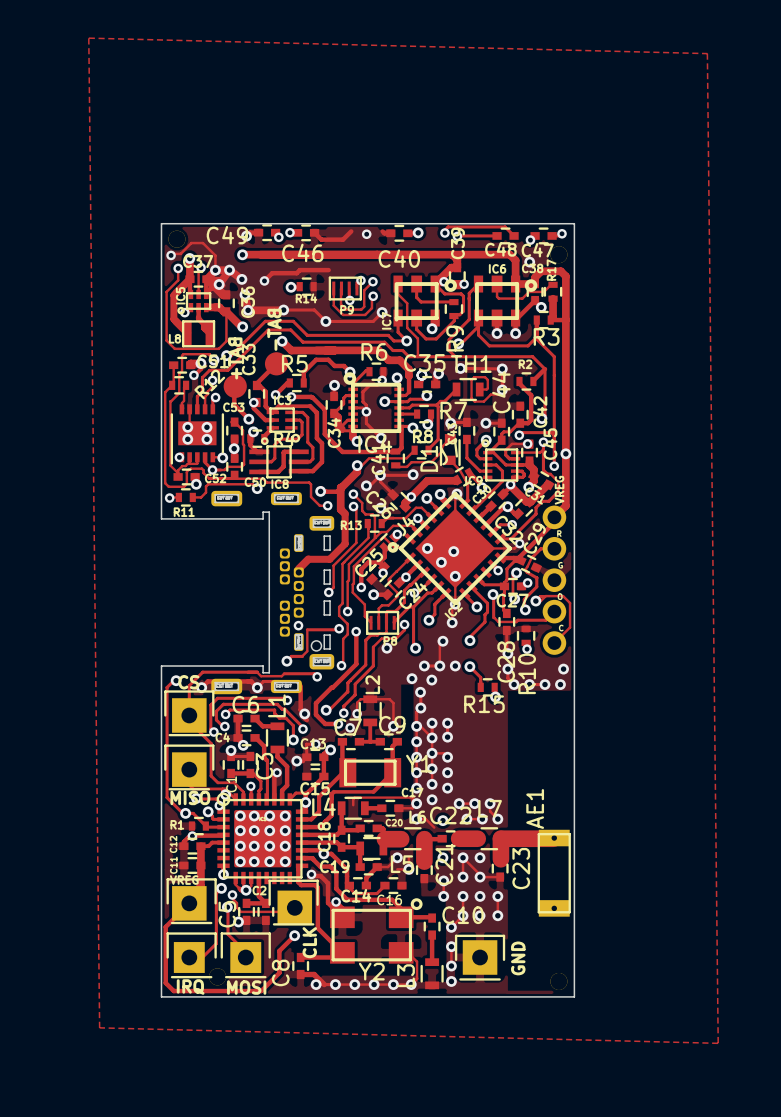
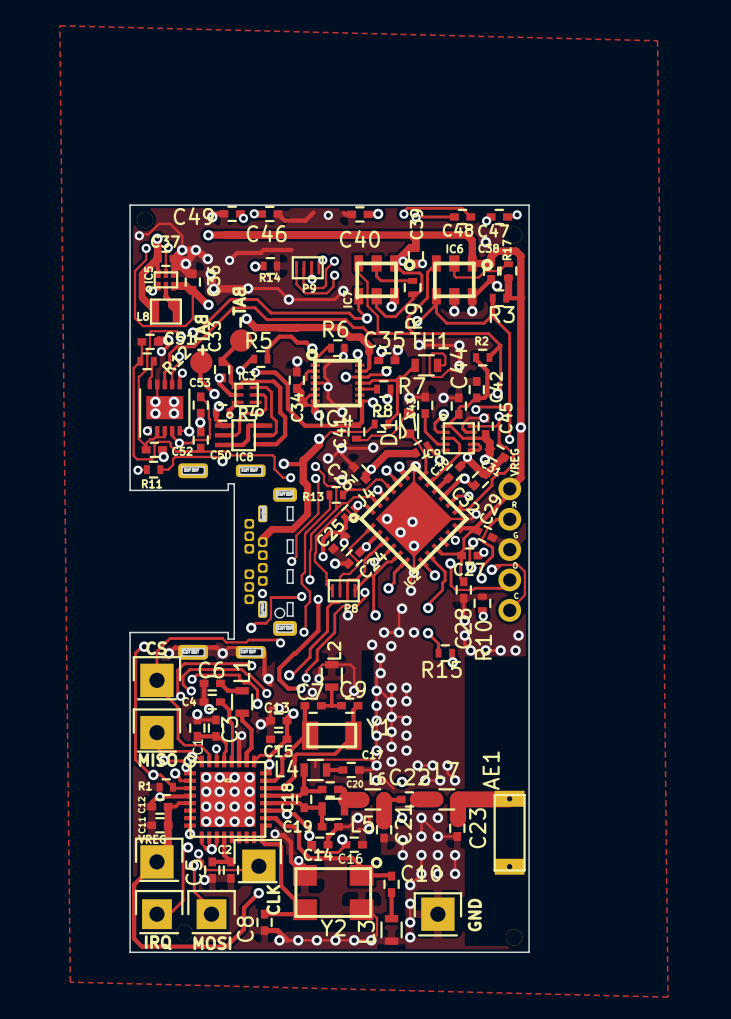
via: none -> (309, 835)
via: none -> (342, 839)

